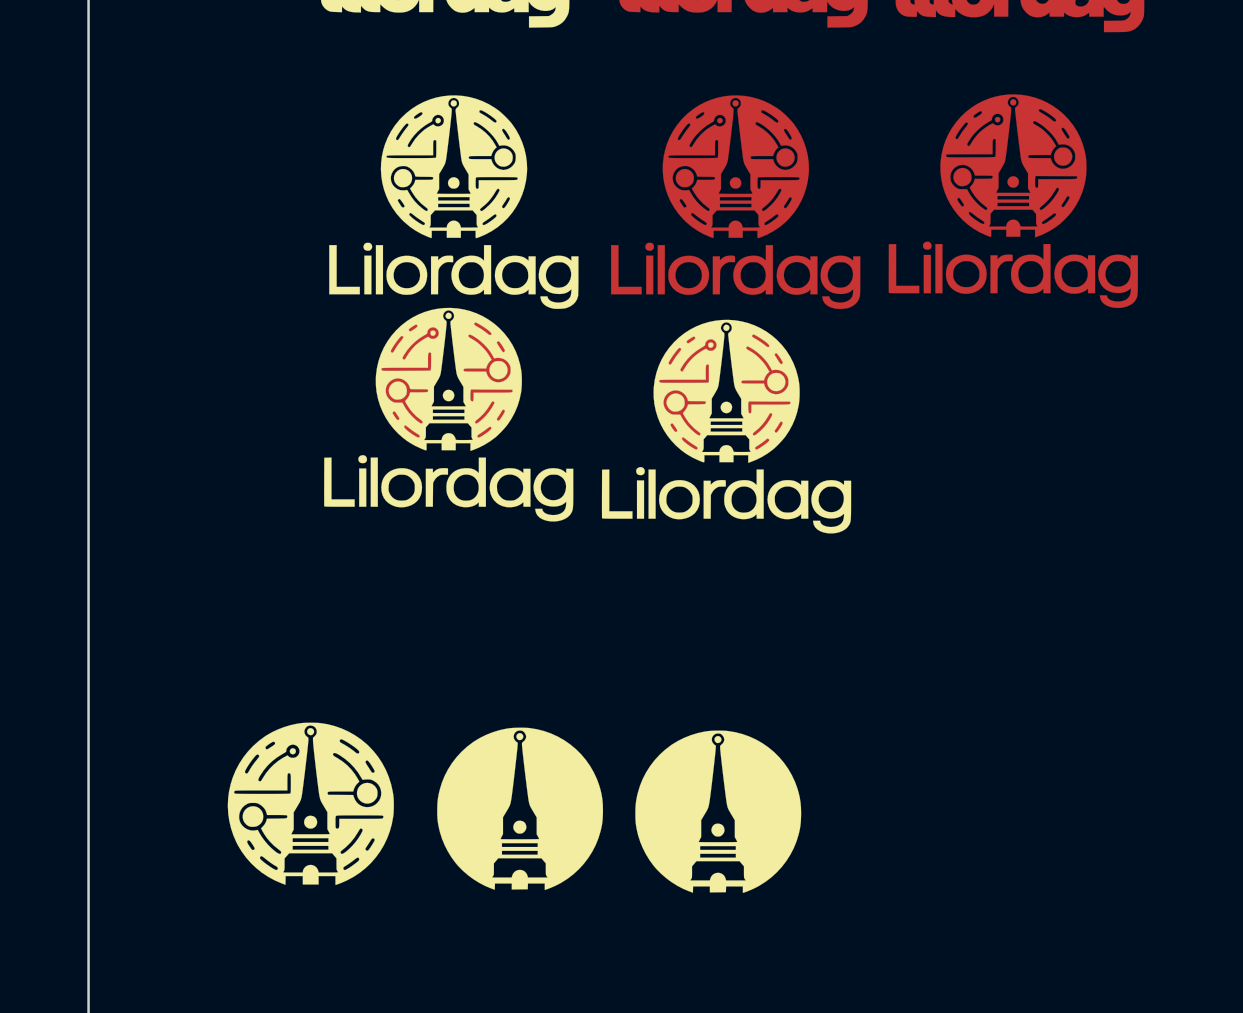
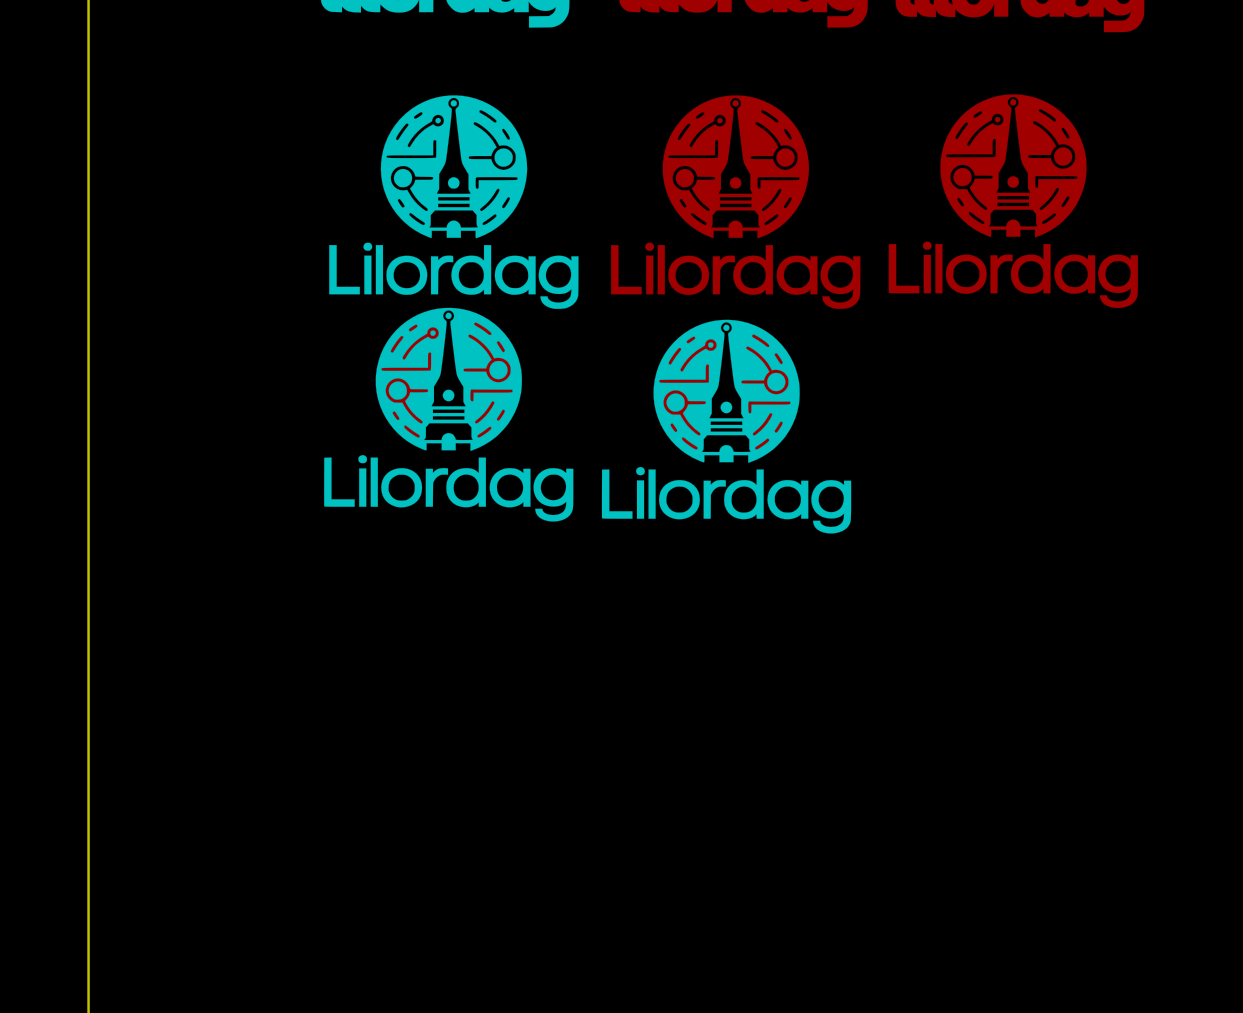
drawing: [227, 722, 394, 885] -> none
drawing: [437, 727, 604, 890] -> none
drawing: [635, 730, 802, 893] -> none

